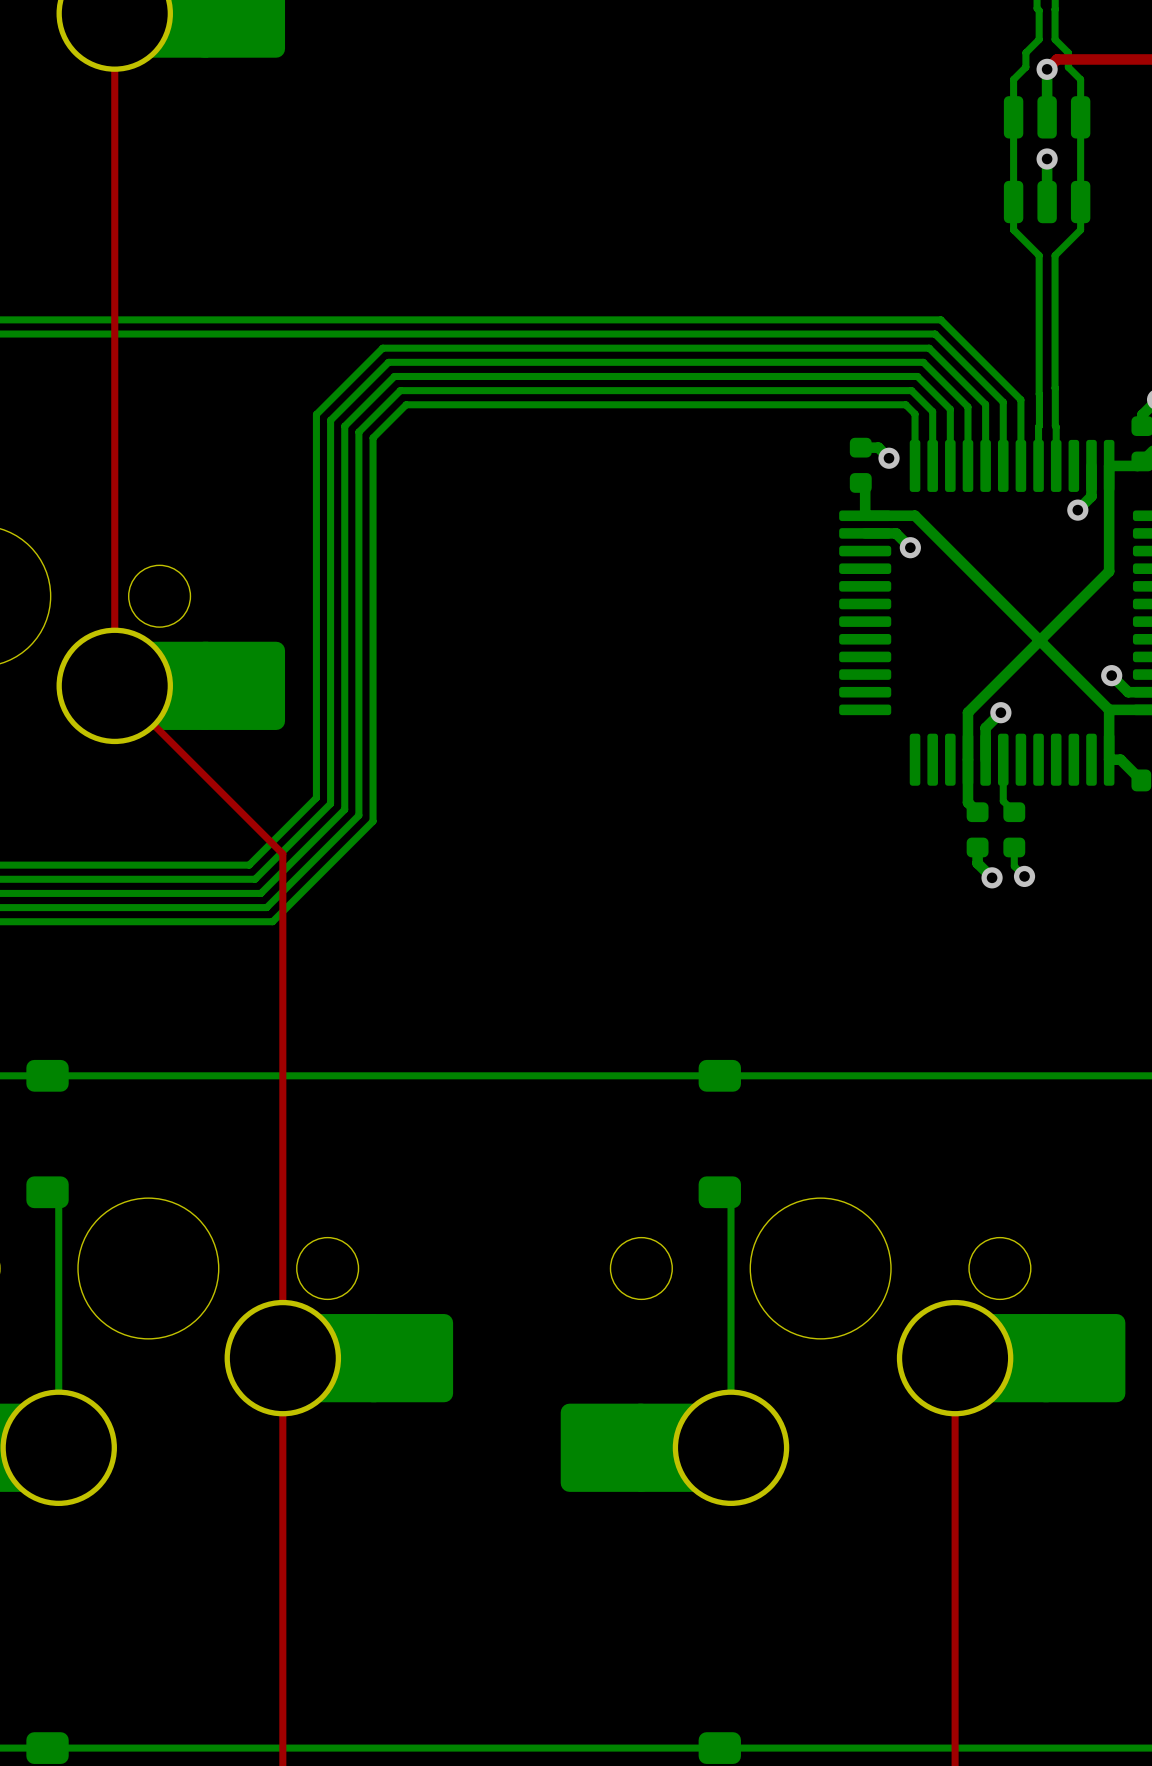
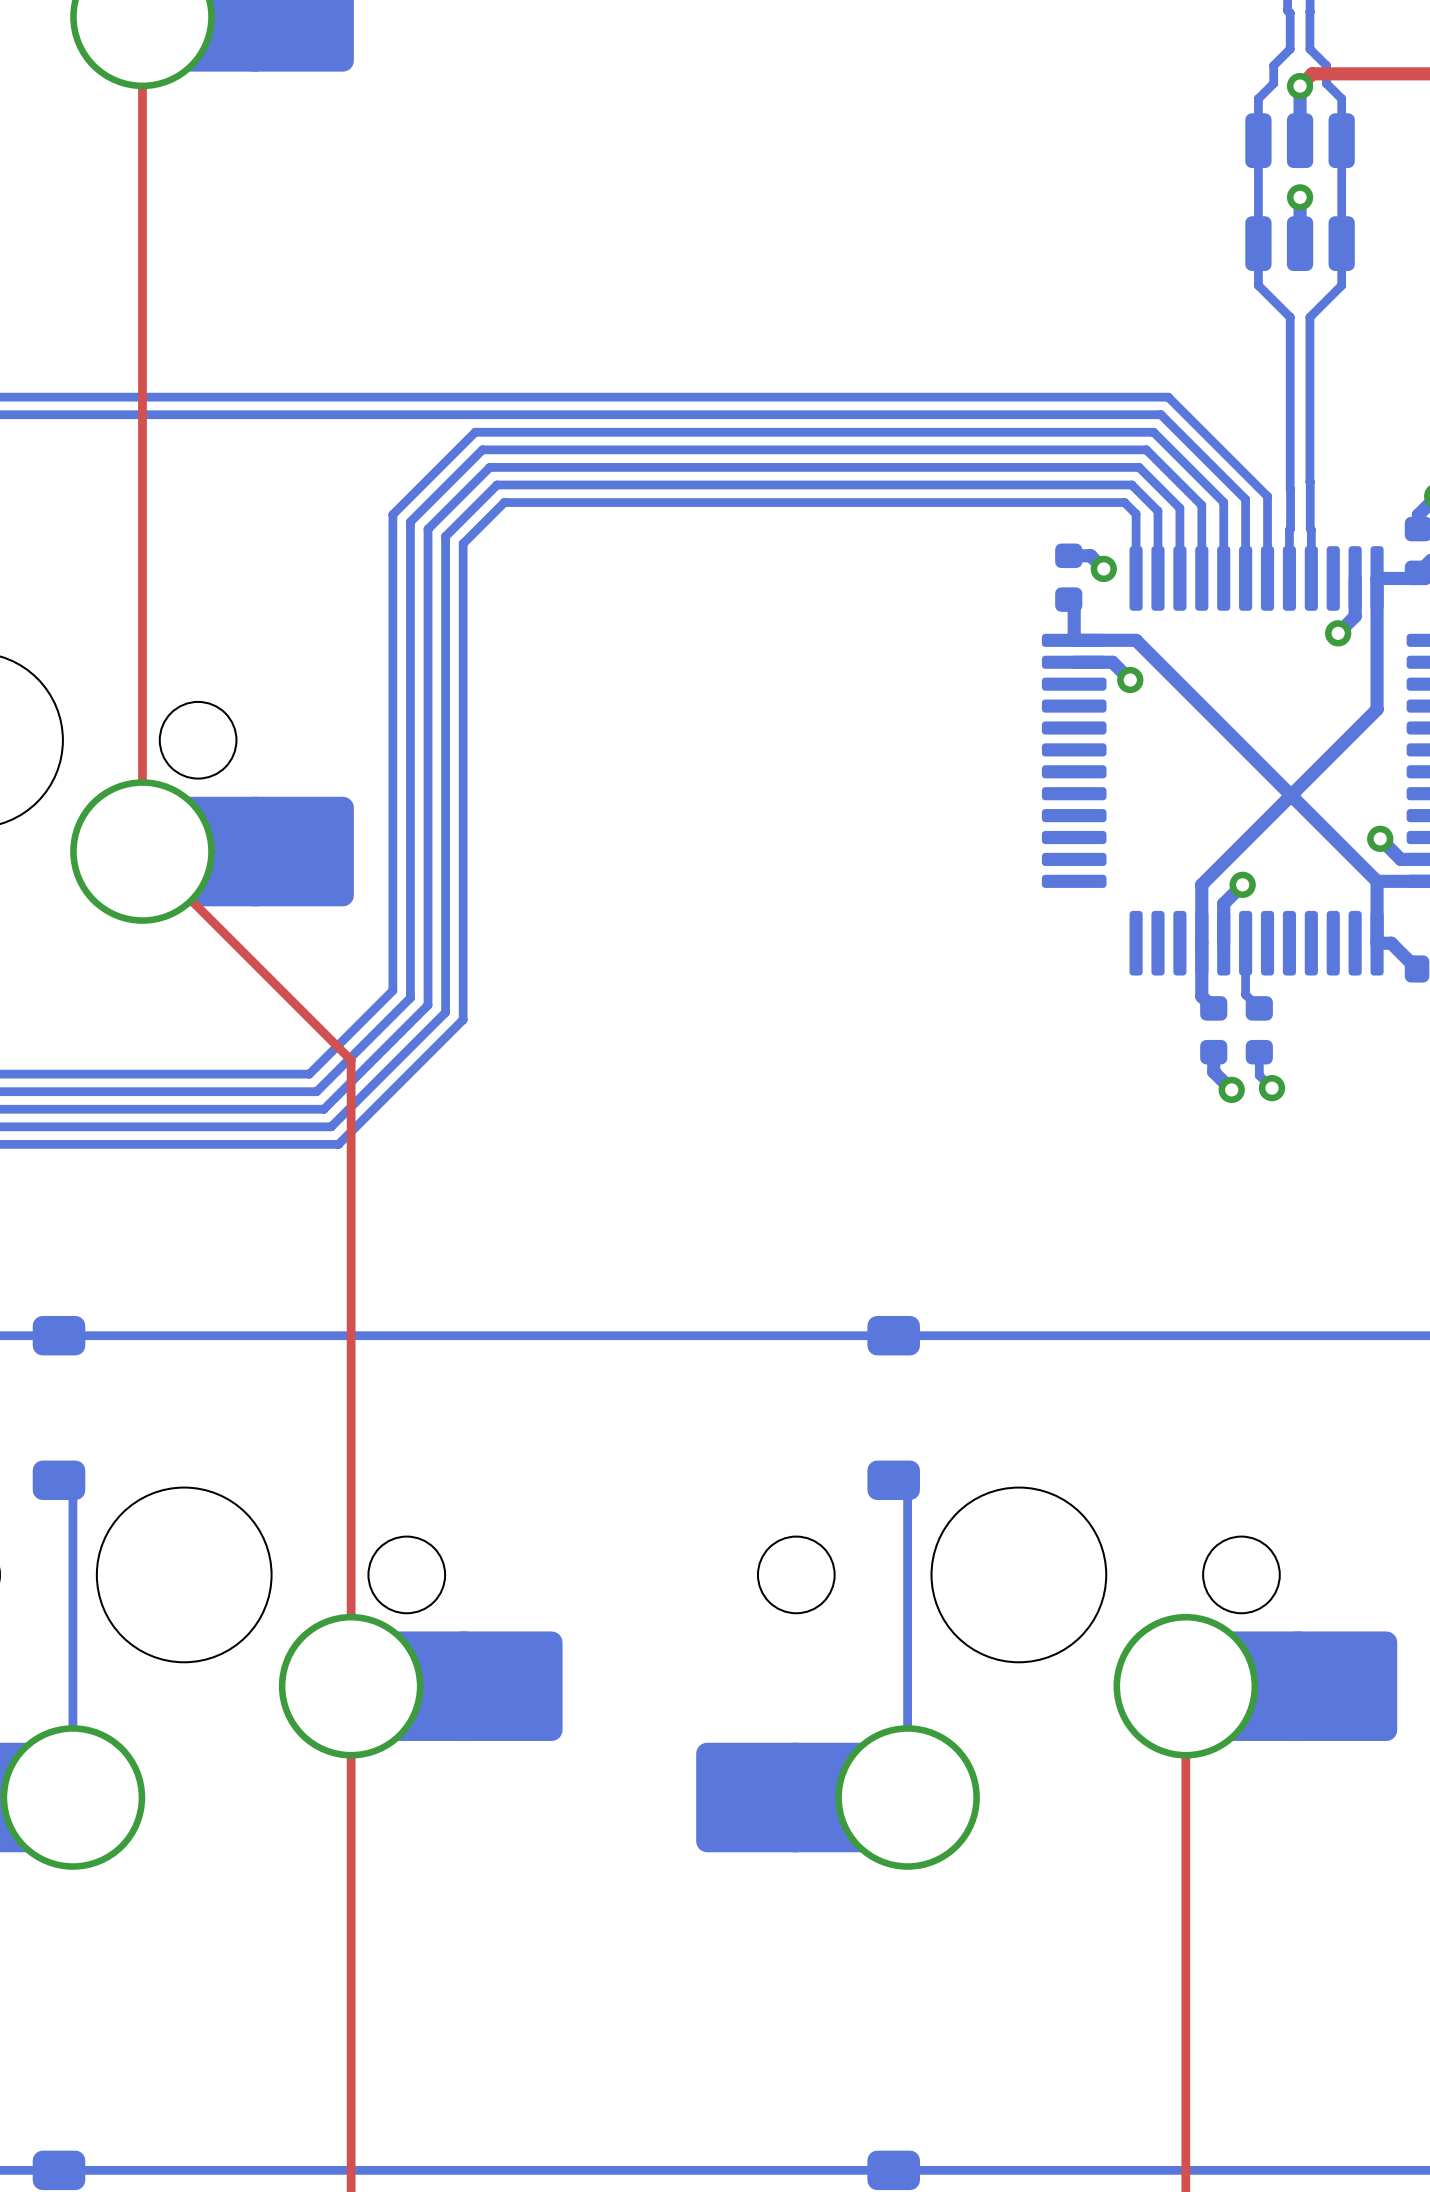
part footprint: [1003, 96, 1091, 224] -> [1245, 113, 1355, 272]

